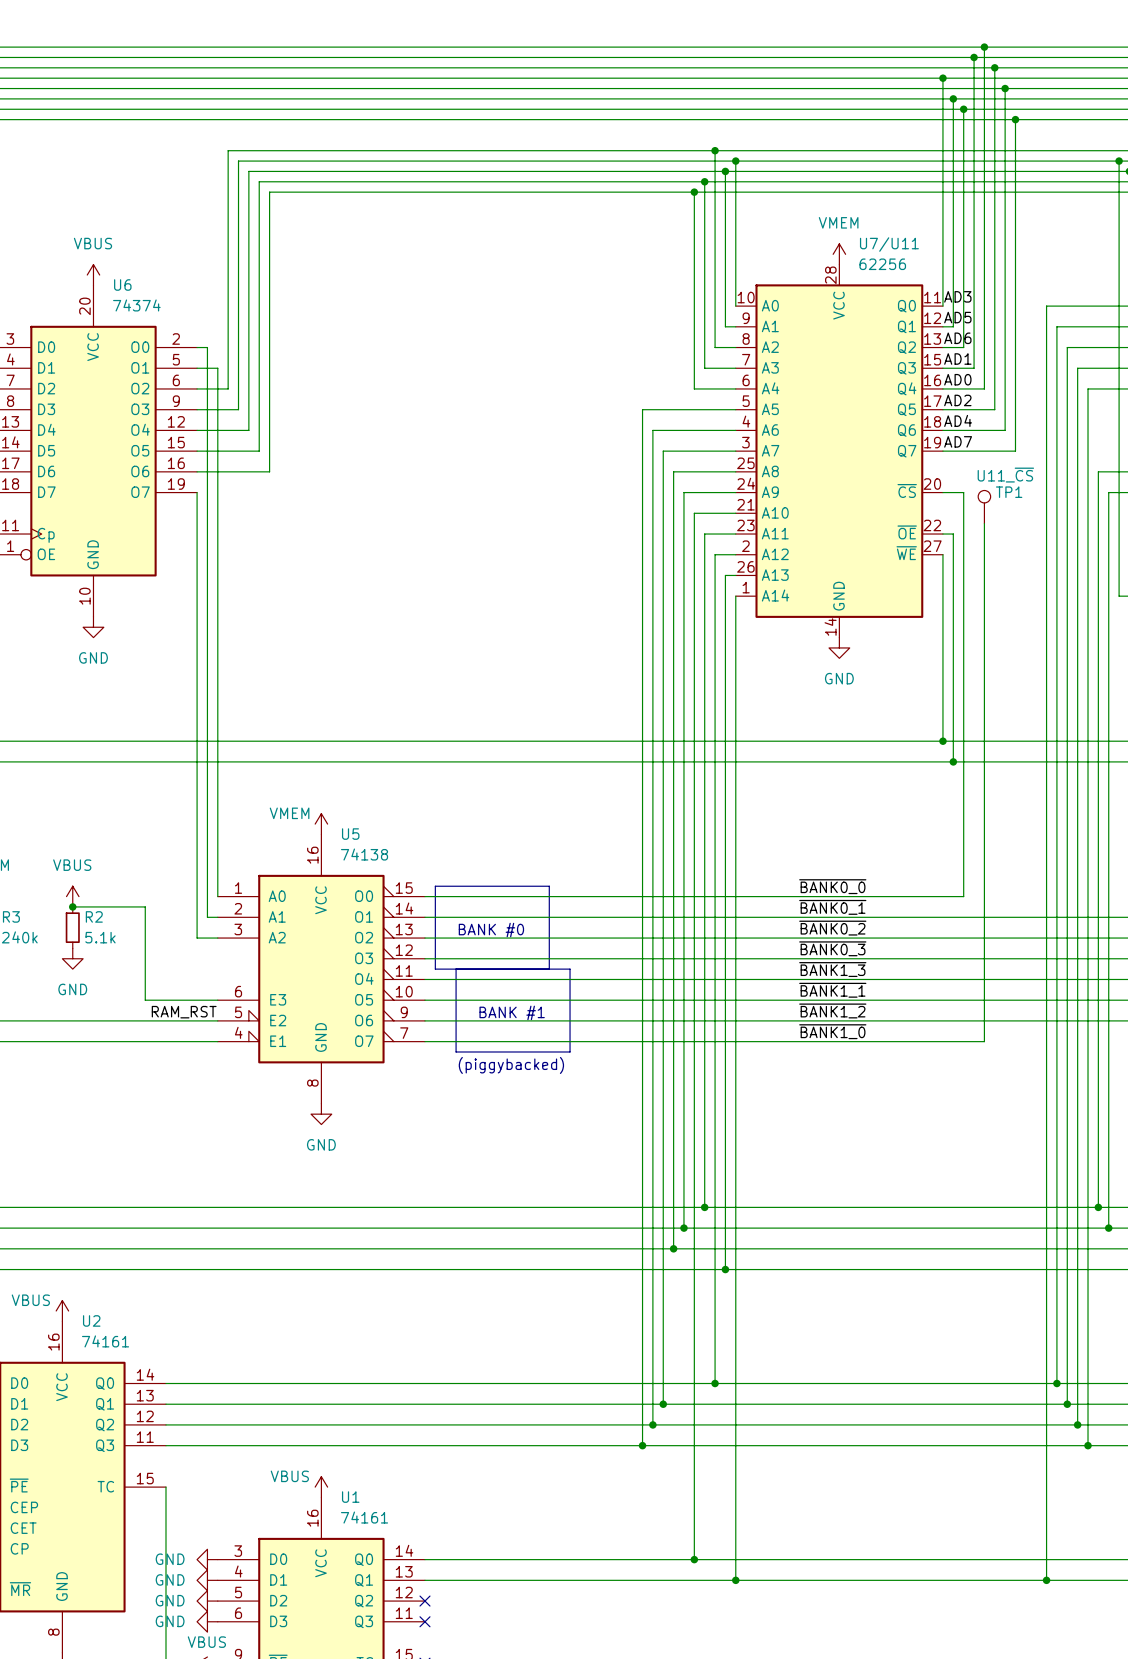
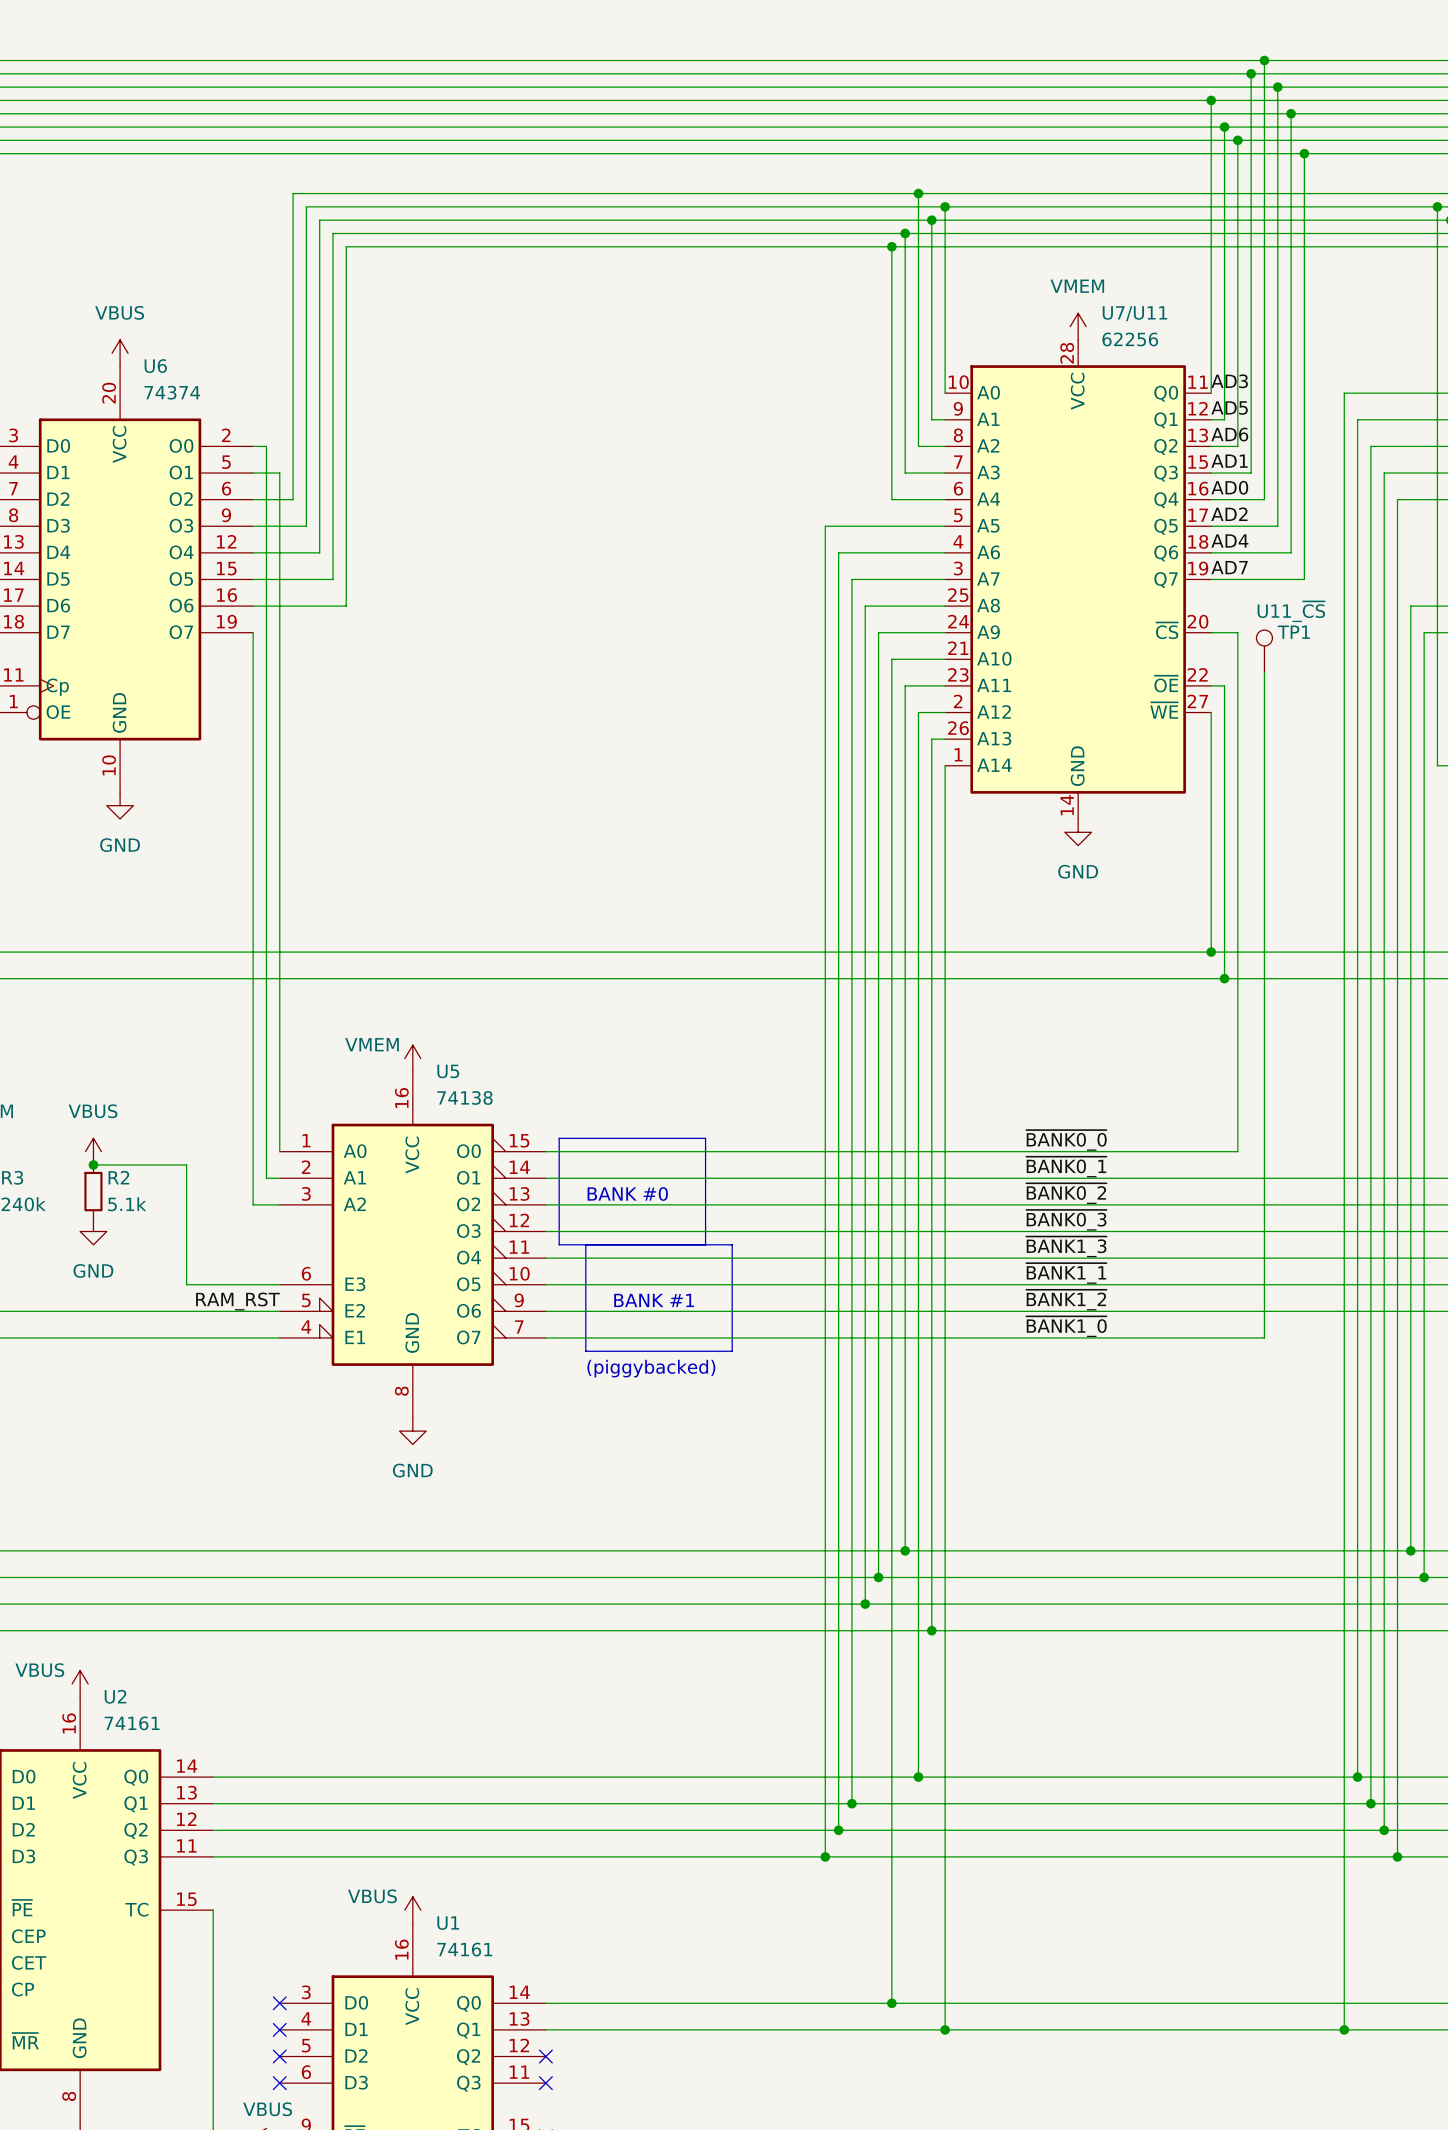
power symbol: GND (207, 1559) -> none
no-connect mark: none -> (279, 2003)
power symbol: GND (207, 1580) -> none
no-connect mark: none -> (279, 2029)
power symbol: GND (207, 1601) -> none
no-connect mark: none -> (279, 2056)
power symbol: GND (207, 1621) -> none
no-connect mark: none -> (279, 2083)

